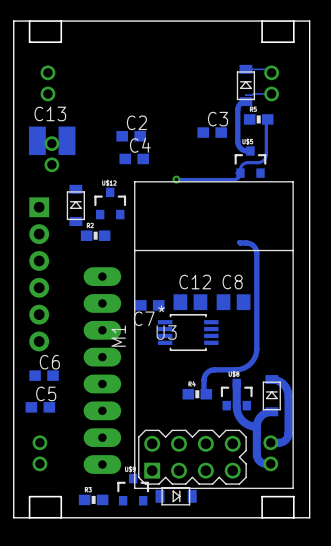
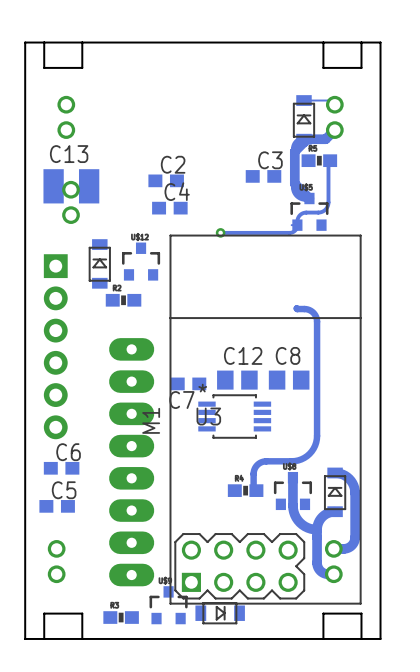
track: (271, 93) (246, 95) -> (334, 130) (325, 139) (303, 139) (303, 142) (294, 151) (294, 183) (309, 198)

